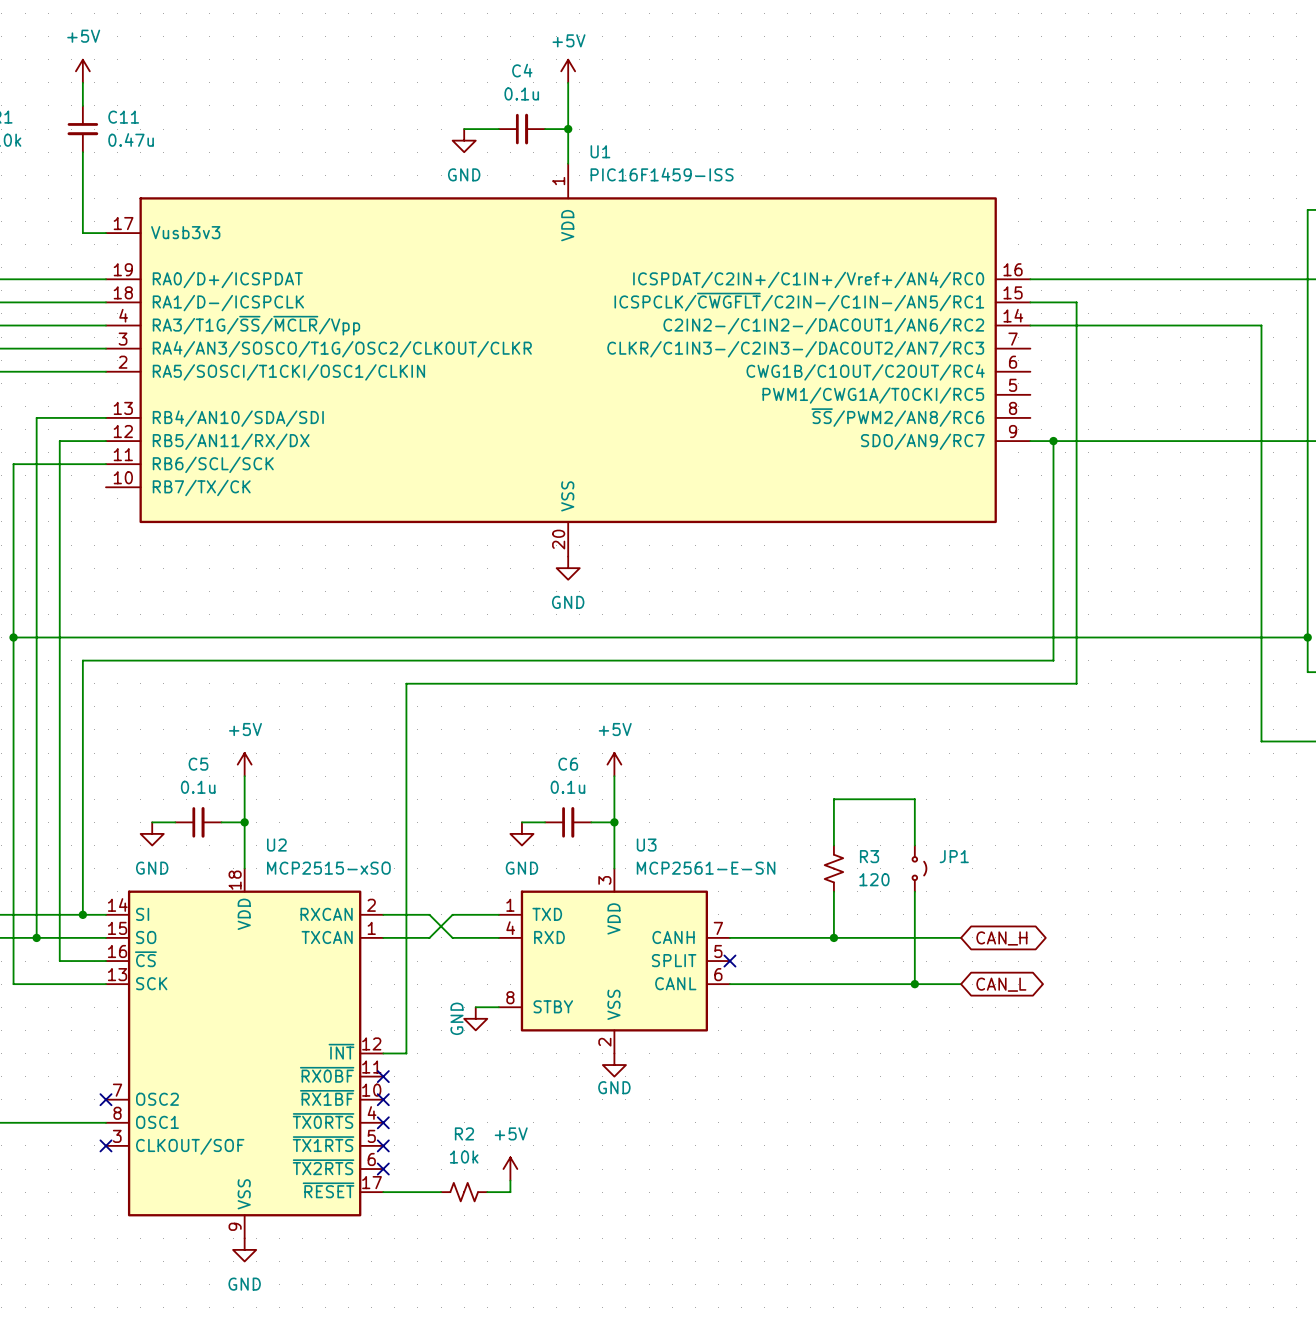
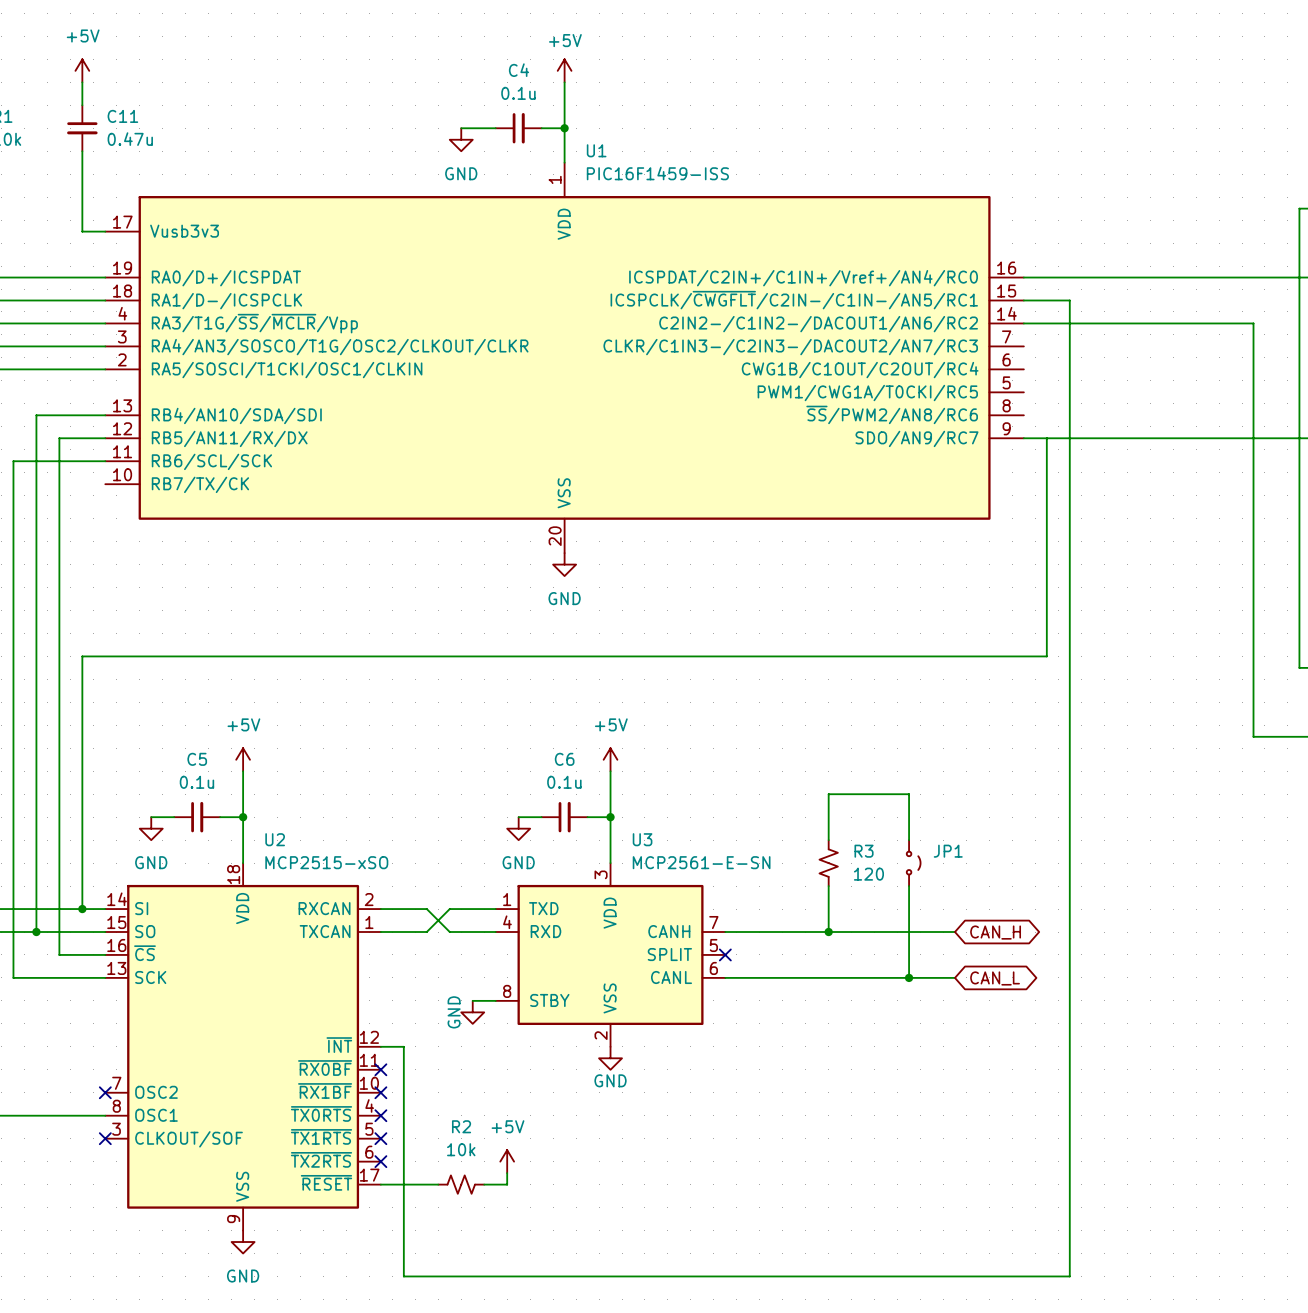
junction: (1053, 441) -> none
wire: (13, 637) (1307, 637) -> none
junction: (13, 637) -> none
junction: (1307, 637) -> none
wire: (1076, 683) (406, 683) (406, 1053) -> (1069, 679) (1069, 1276) (403, 1276) (403, 1046)

